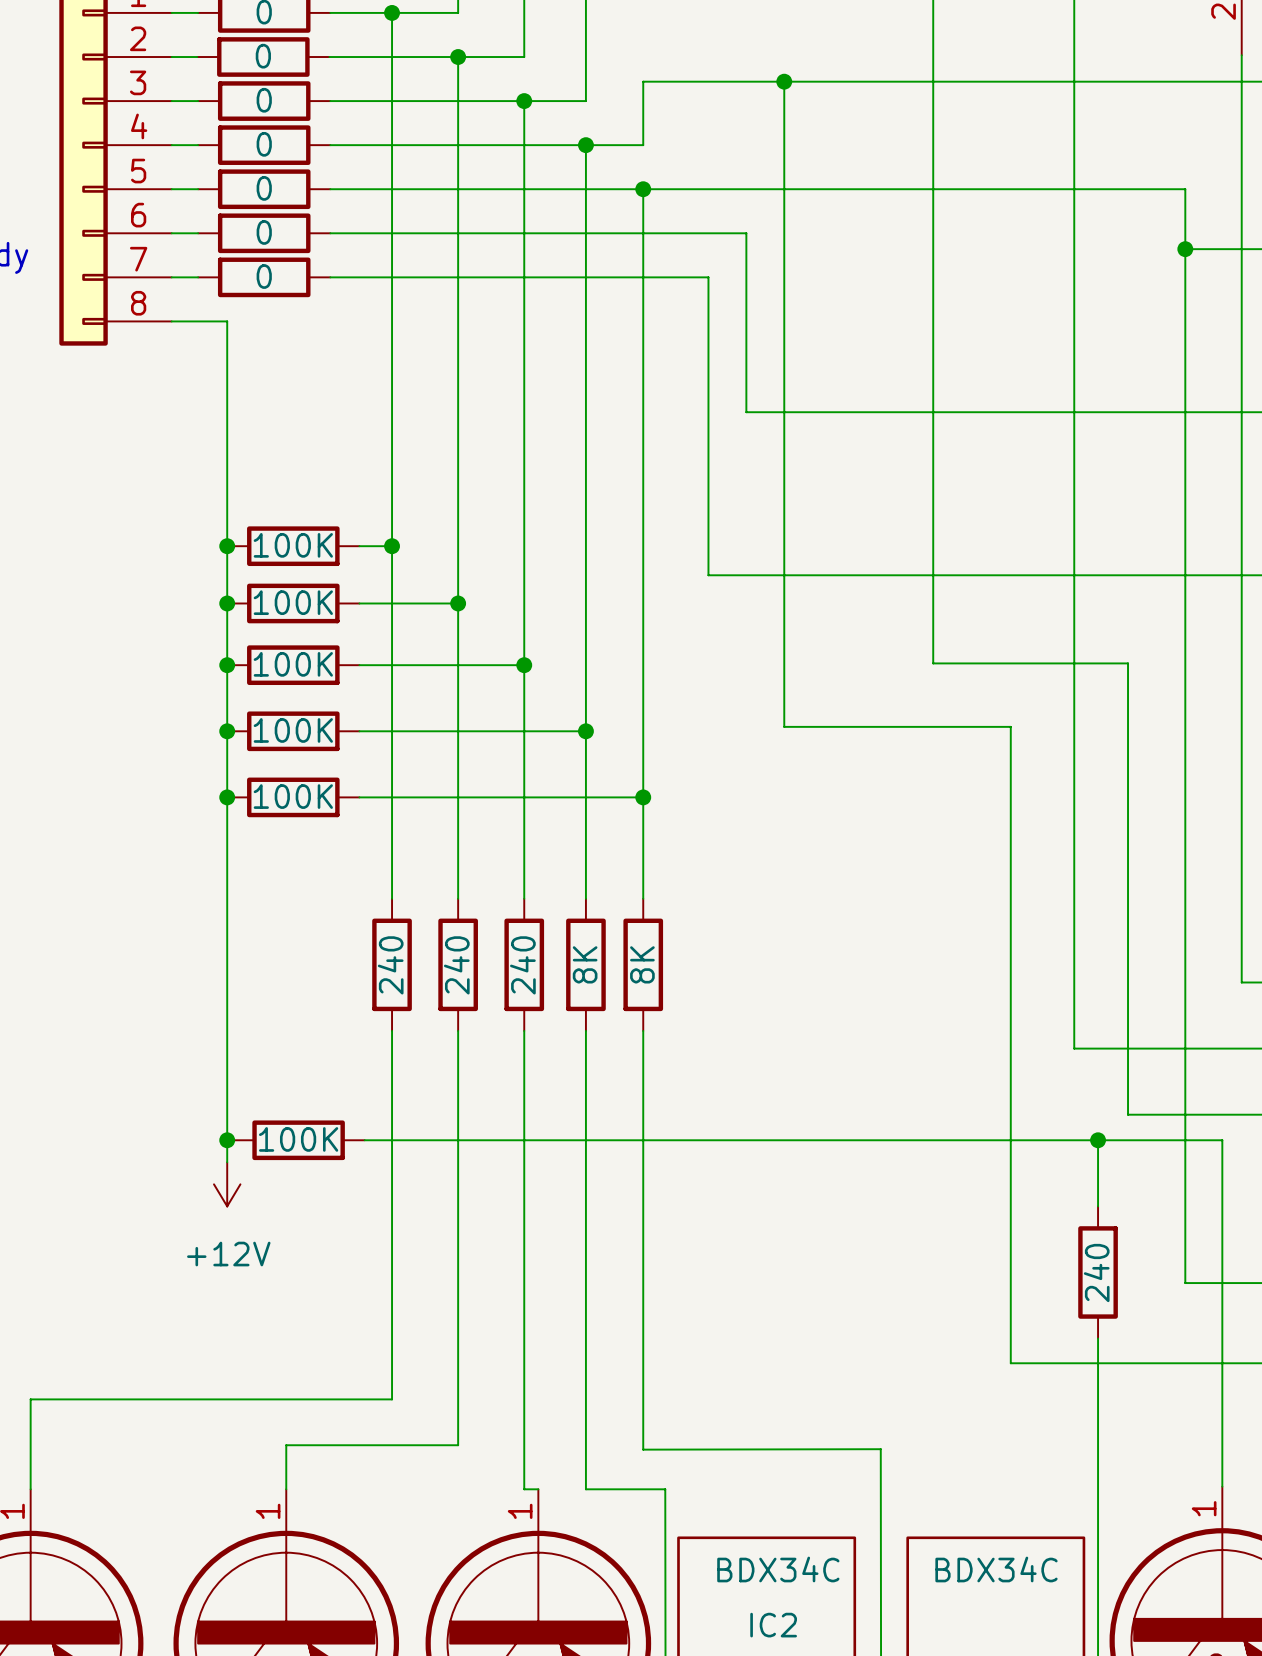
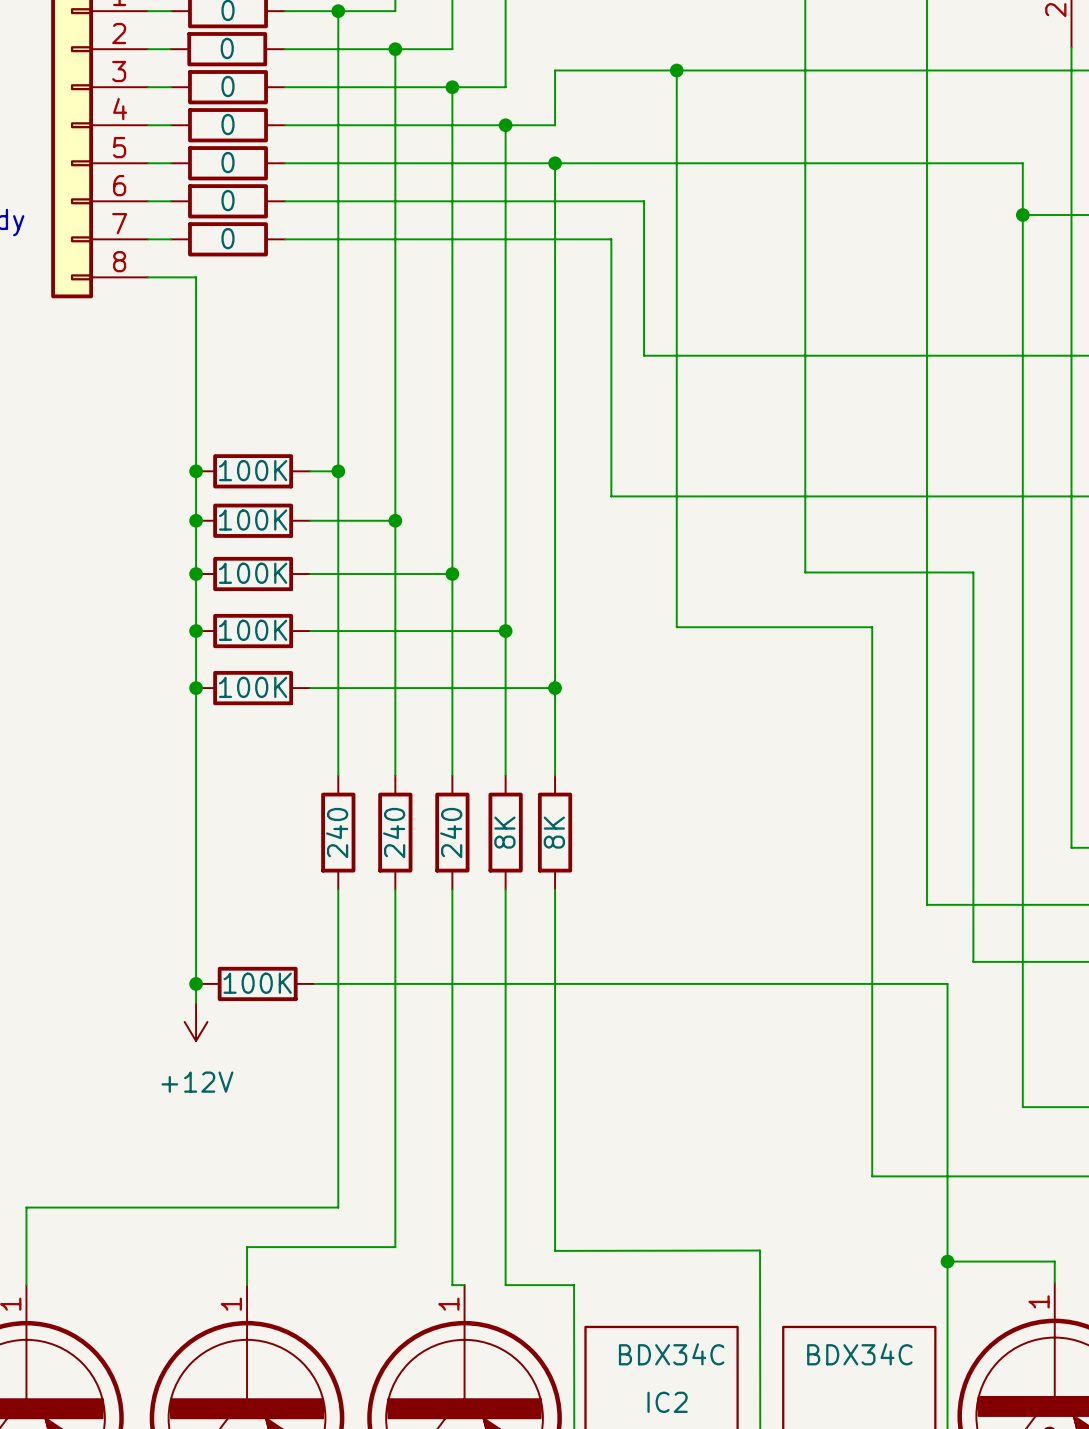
wire: (1098, 1140) (1222, 1140) (1222, 1461) -> (947, 1261) (1054, 1261)
junction: (1098, 1140) -> none
wire: none -> (947, 1040) (947, 1155)
part: 240 (1098, 1272) -> none
junction: none -> (947, 1261)

